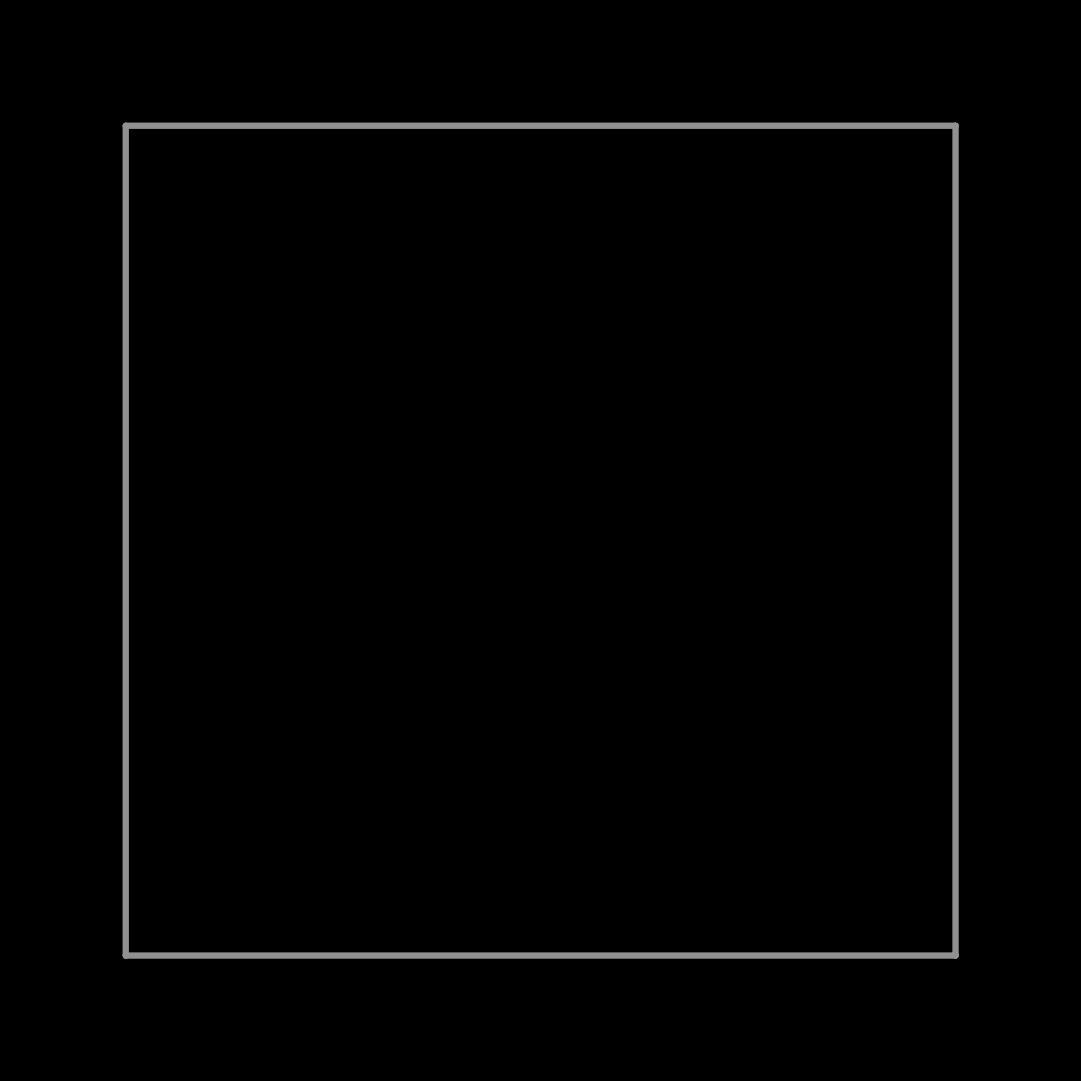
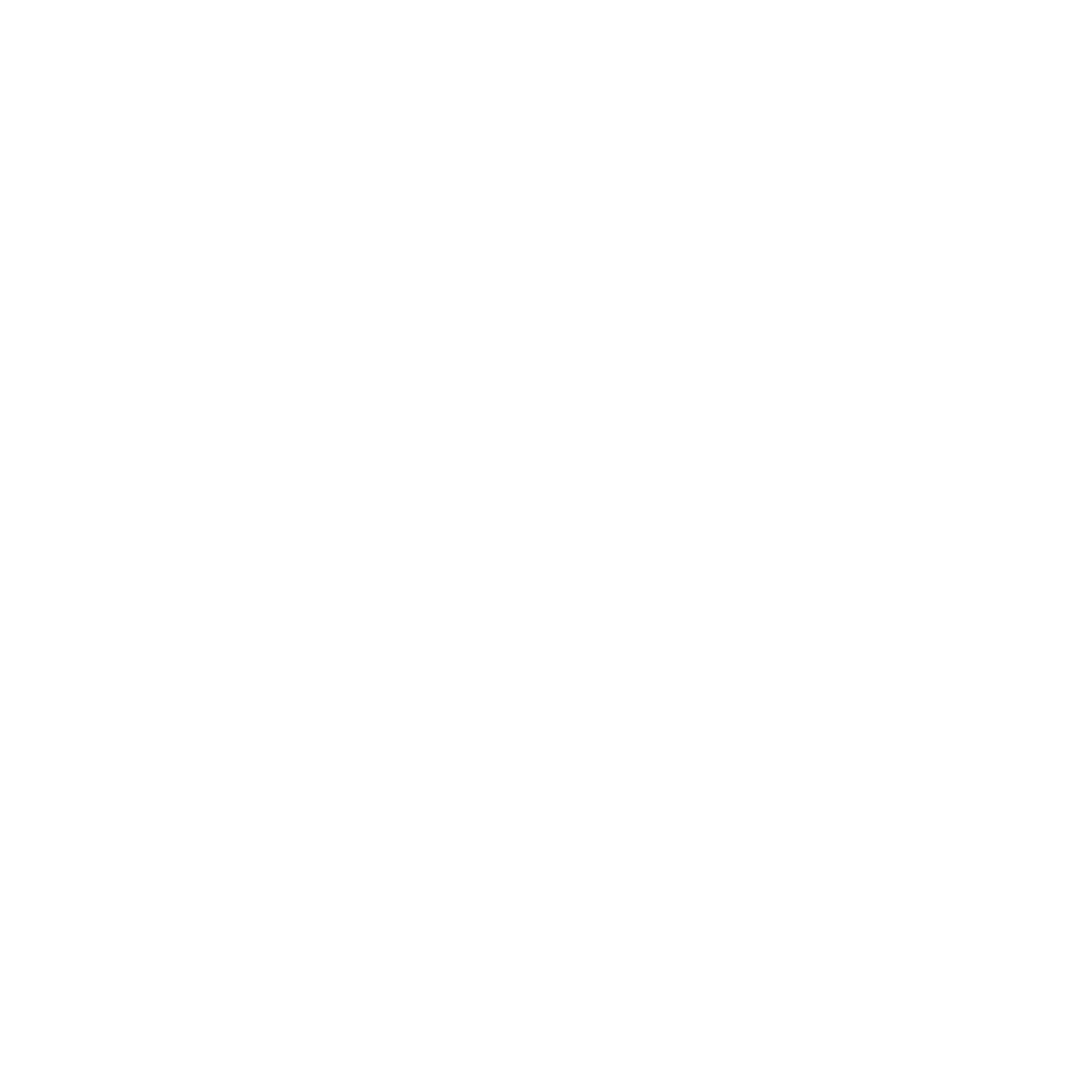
line: (125, 125) (125, 955) (955, 955) (955, 125) (125, 125) -> none

